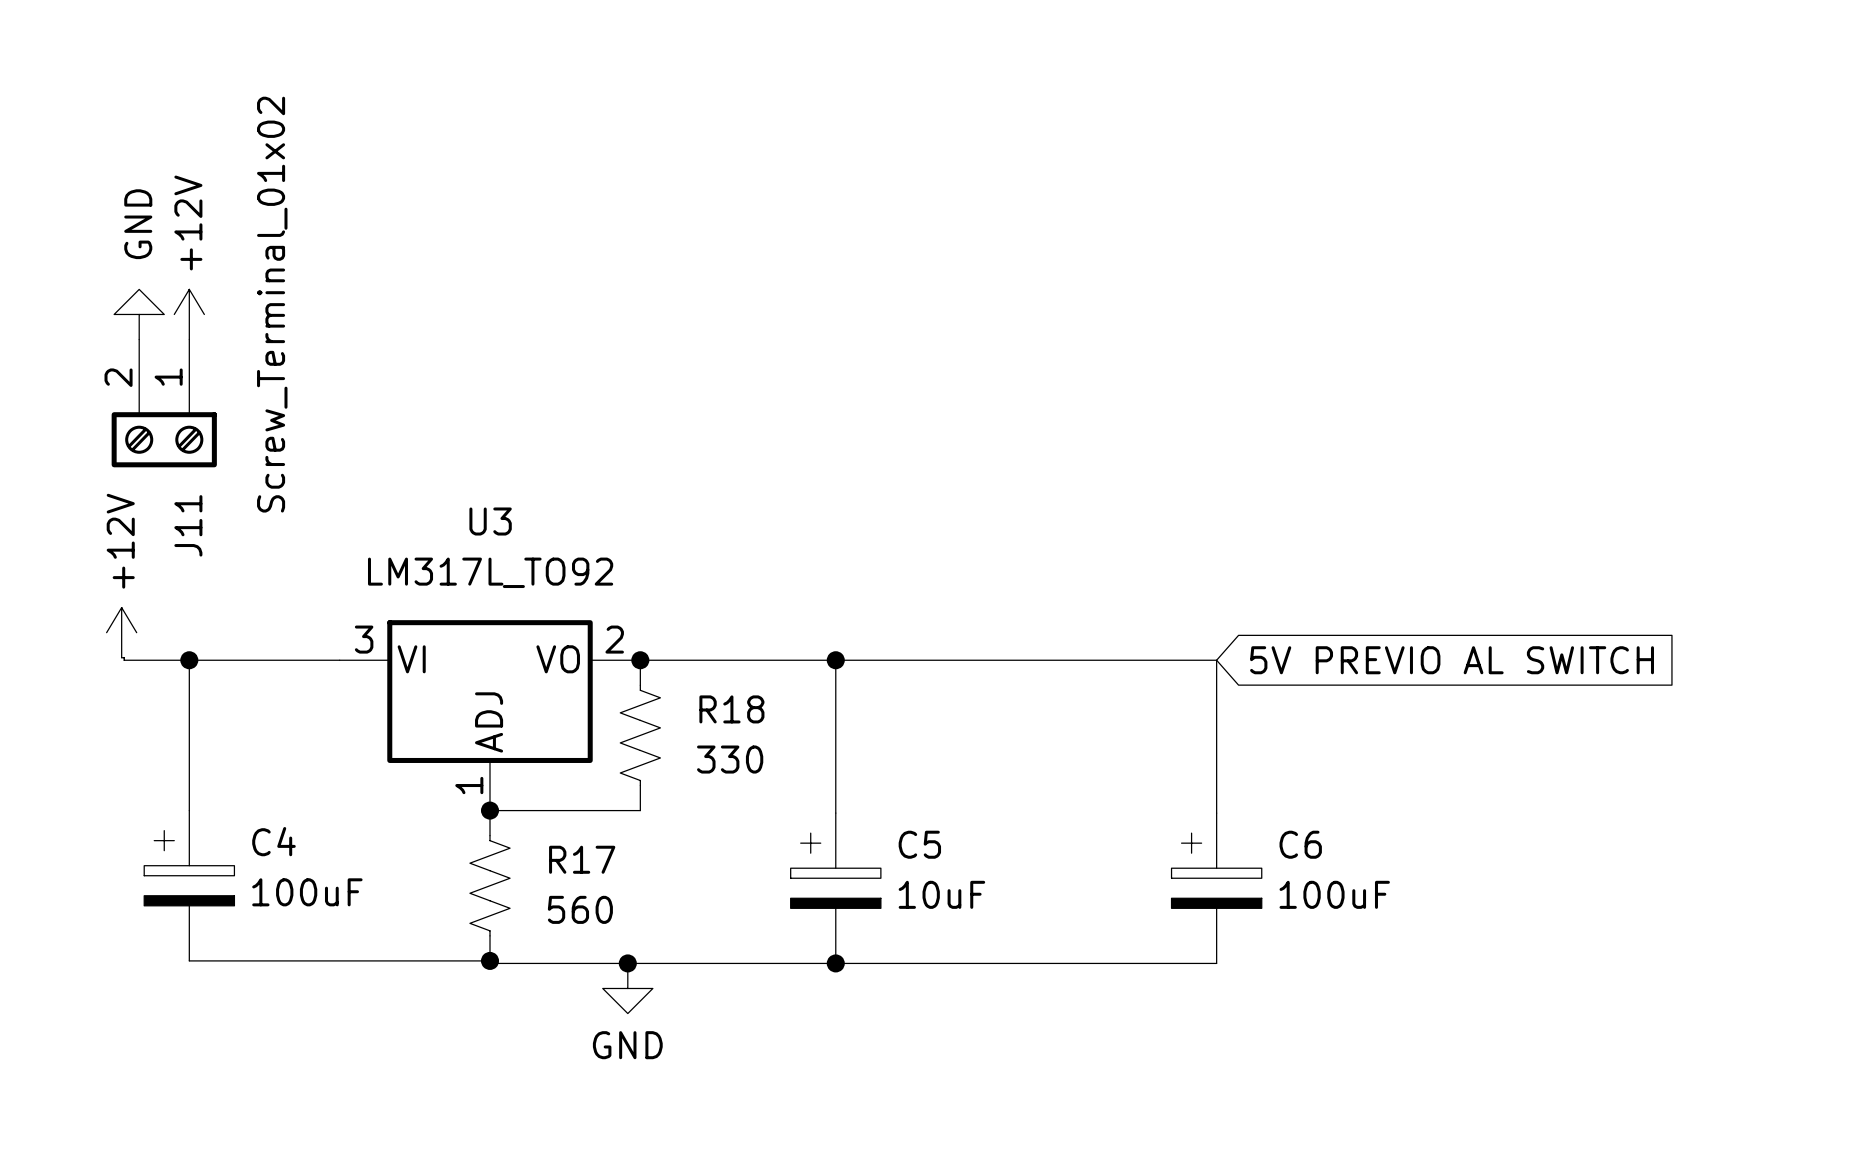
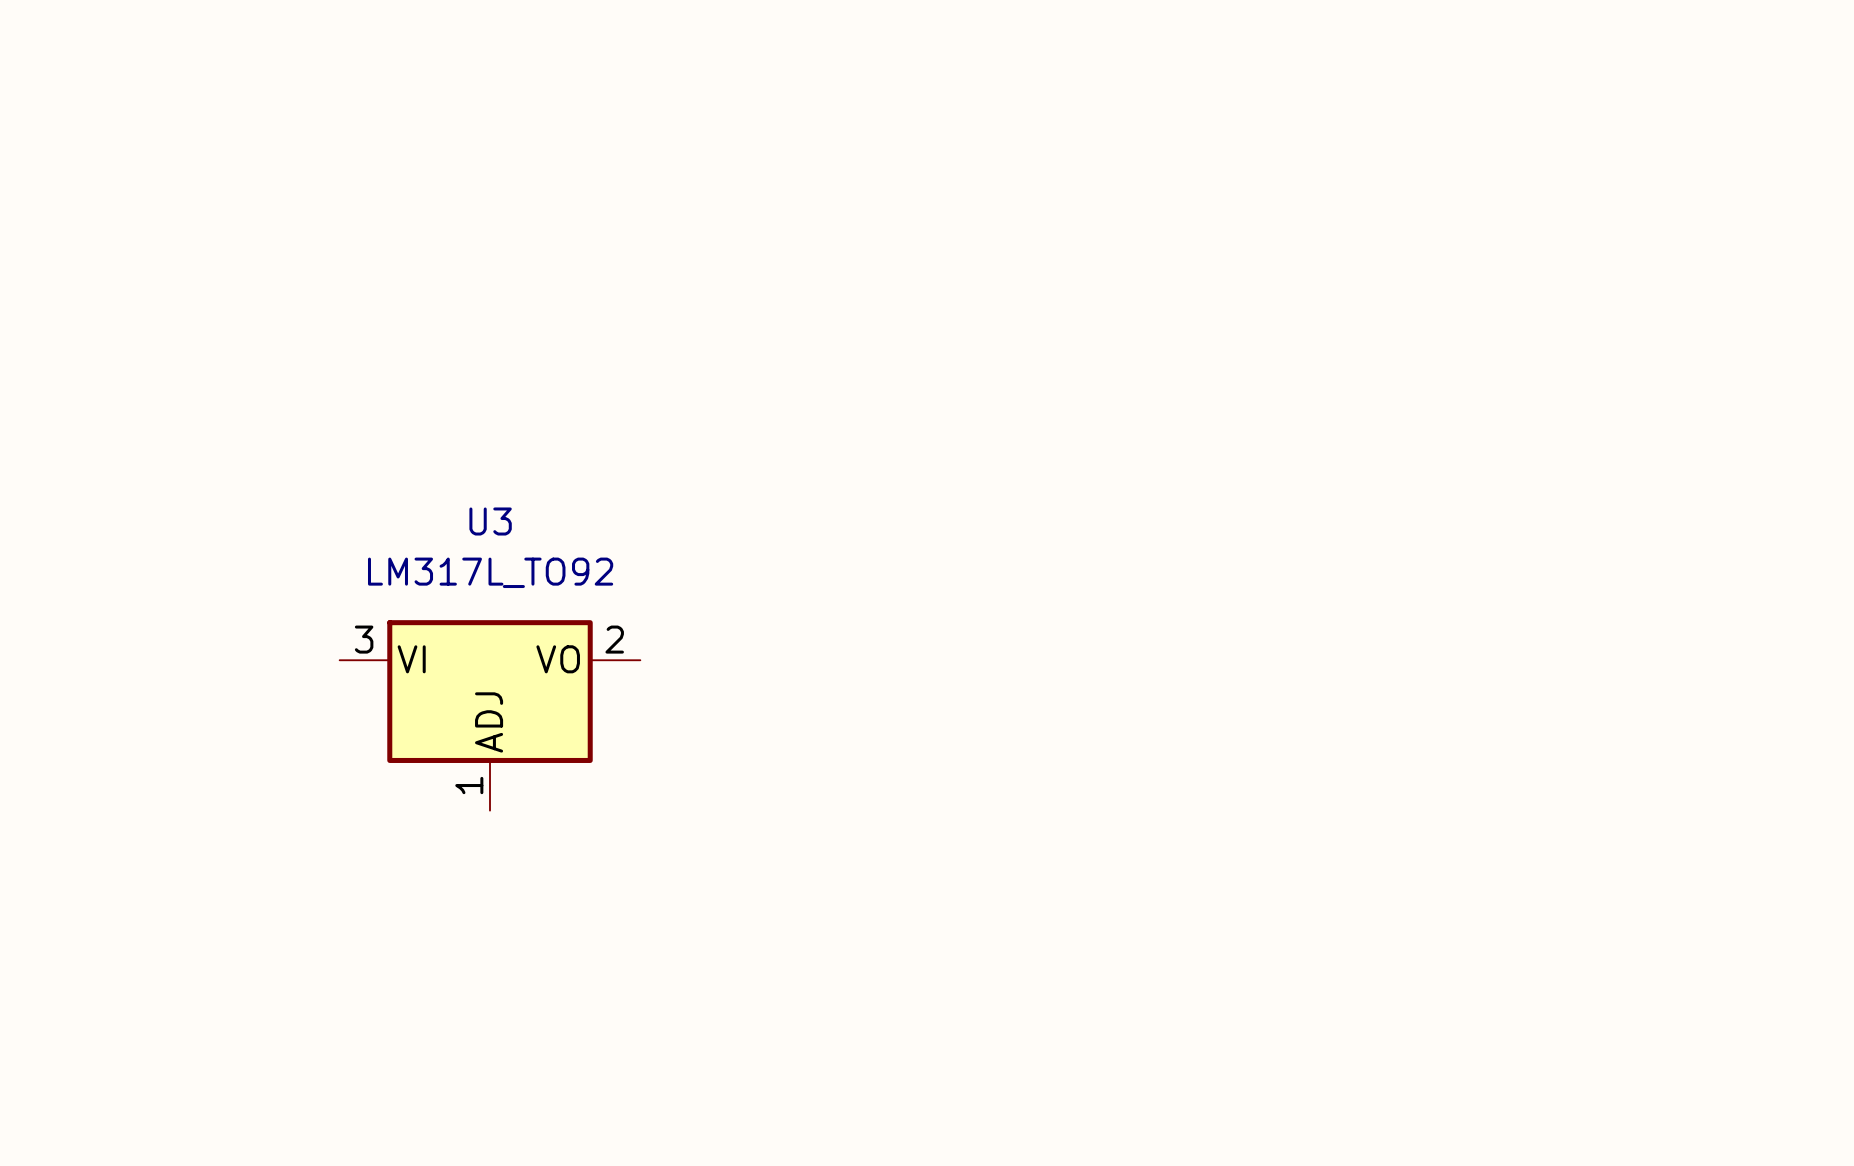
power symbol: GND (139, 314) -> none
power symbol: +12V (189, 314) -> none
J11: Screw_Terminal_01x02 (164, 403) -> none
power symbol: +12V (121, 632) -> none
wire: (121, 657) (124, 657) (124, 660) (339, 660) -> none
wire: (189, 660) (189, 810) -> none
junction: (189, 660) -> none
wire: (640, 660) (1216, 660) (1216, 813) -> none
junction: (640, 660) -> none
wire: (835, 660) (835, 813) -> none
junction: (835, 660) -> none
global label: 5V PREVIO AL SWITCH (1452, 660) -> none
R18: 330 (640, 735) -> none
wire: (490, 810) (640, 810) -> none
junction: (490, 810) -> none
C4: 100uF (189, 885) -> none
R17: 560 (490, 885) -> none
C5: 10uF (835, 888) -> none
C6: 100uF (1216, 888) -> none
wire: (189, 960) (490, 960) (490, 963) (1216, 963) -> none
junction: (490, 960) -> none
junction: (627, 963) -> none
junction: (835, 963) -> none
power symbol: GND (627, 988) -> none

